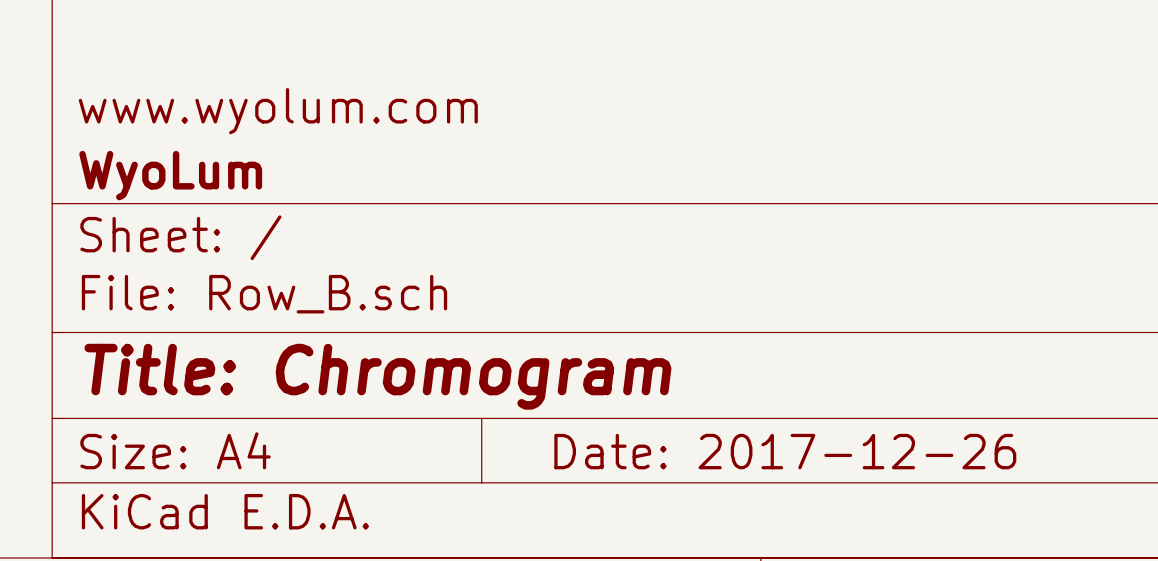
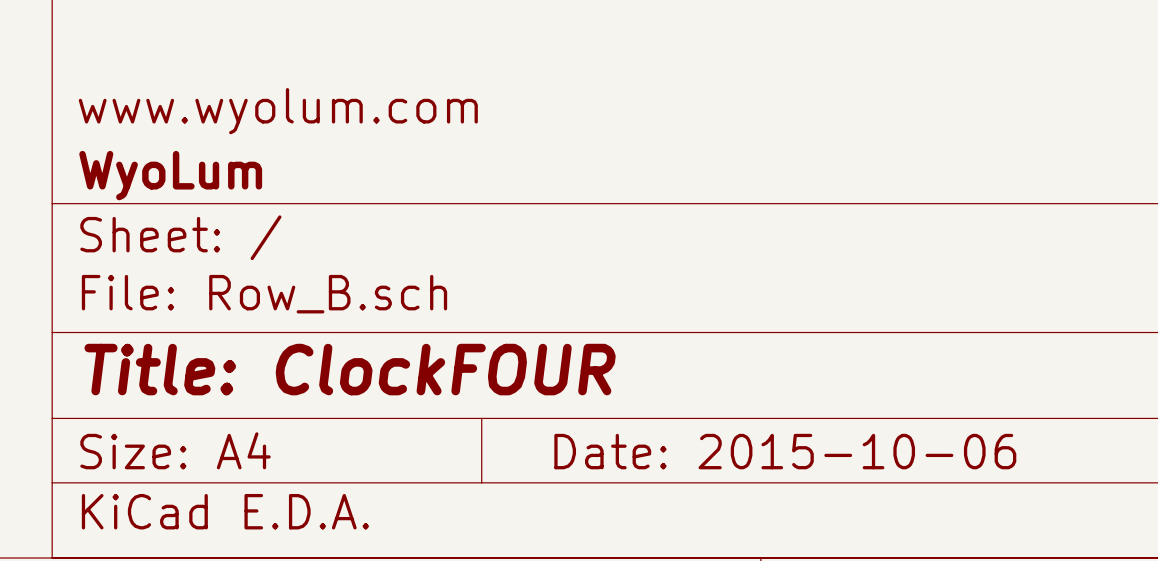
title block: Title: Chromogram (377, 376) -> Title: ClockFOUR (350, 369)
title block: Date: 2017-12-26 (785, 451) -> Date: 2015-10-06 (785, 451)

